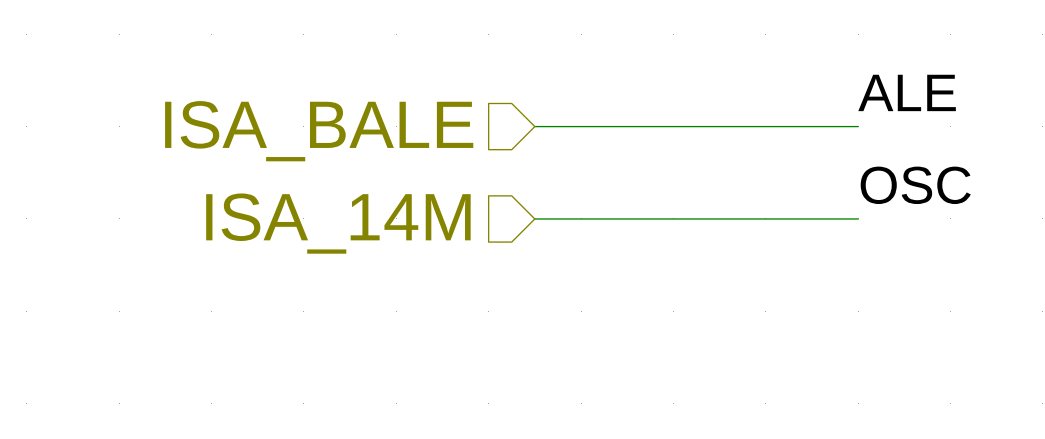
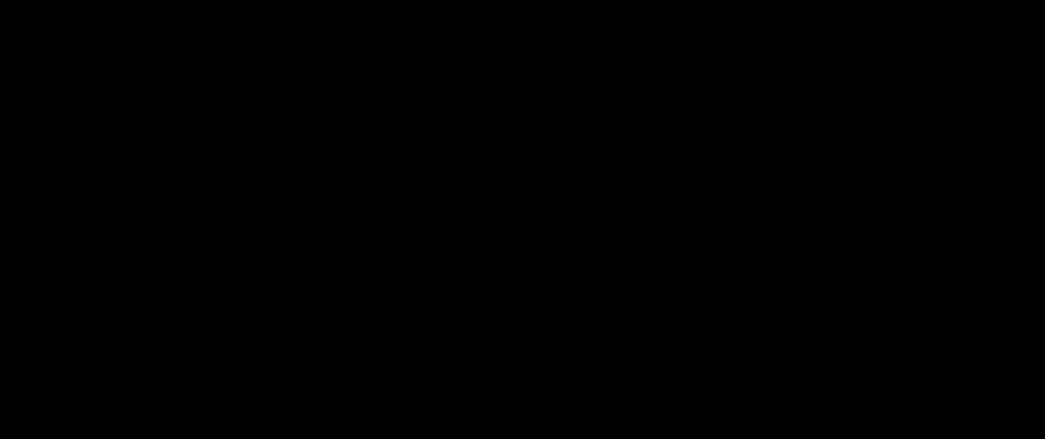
label: ALE (907, 92) -> none
wire: (534, 126) (858, 126) -> none
hierarchical label: ISA_BALE (319, 131) -> none
label: OSC (915, 185) -> none
wire: (534, 218) (858, 218) -> none
hierarchical label: ISA_14M (338, 223) -> none

